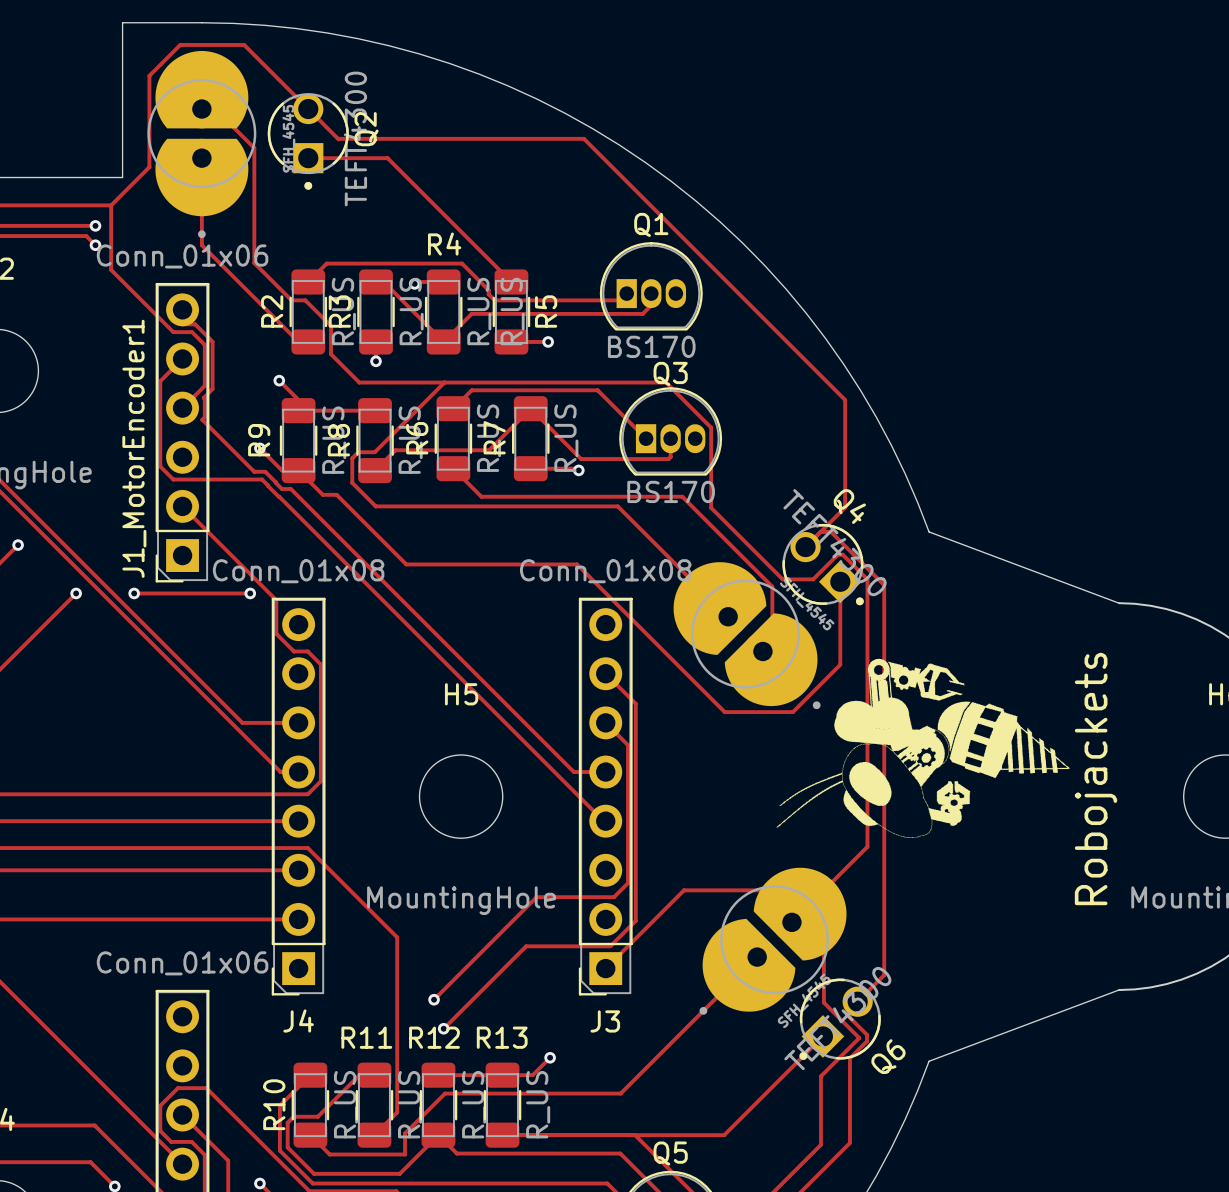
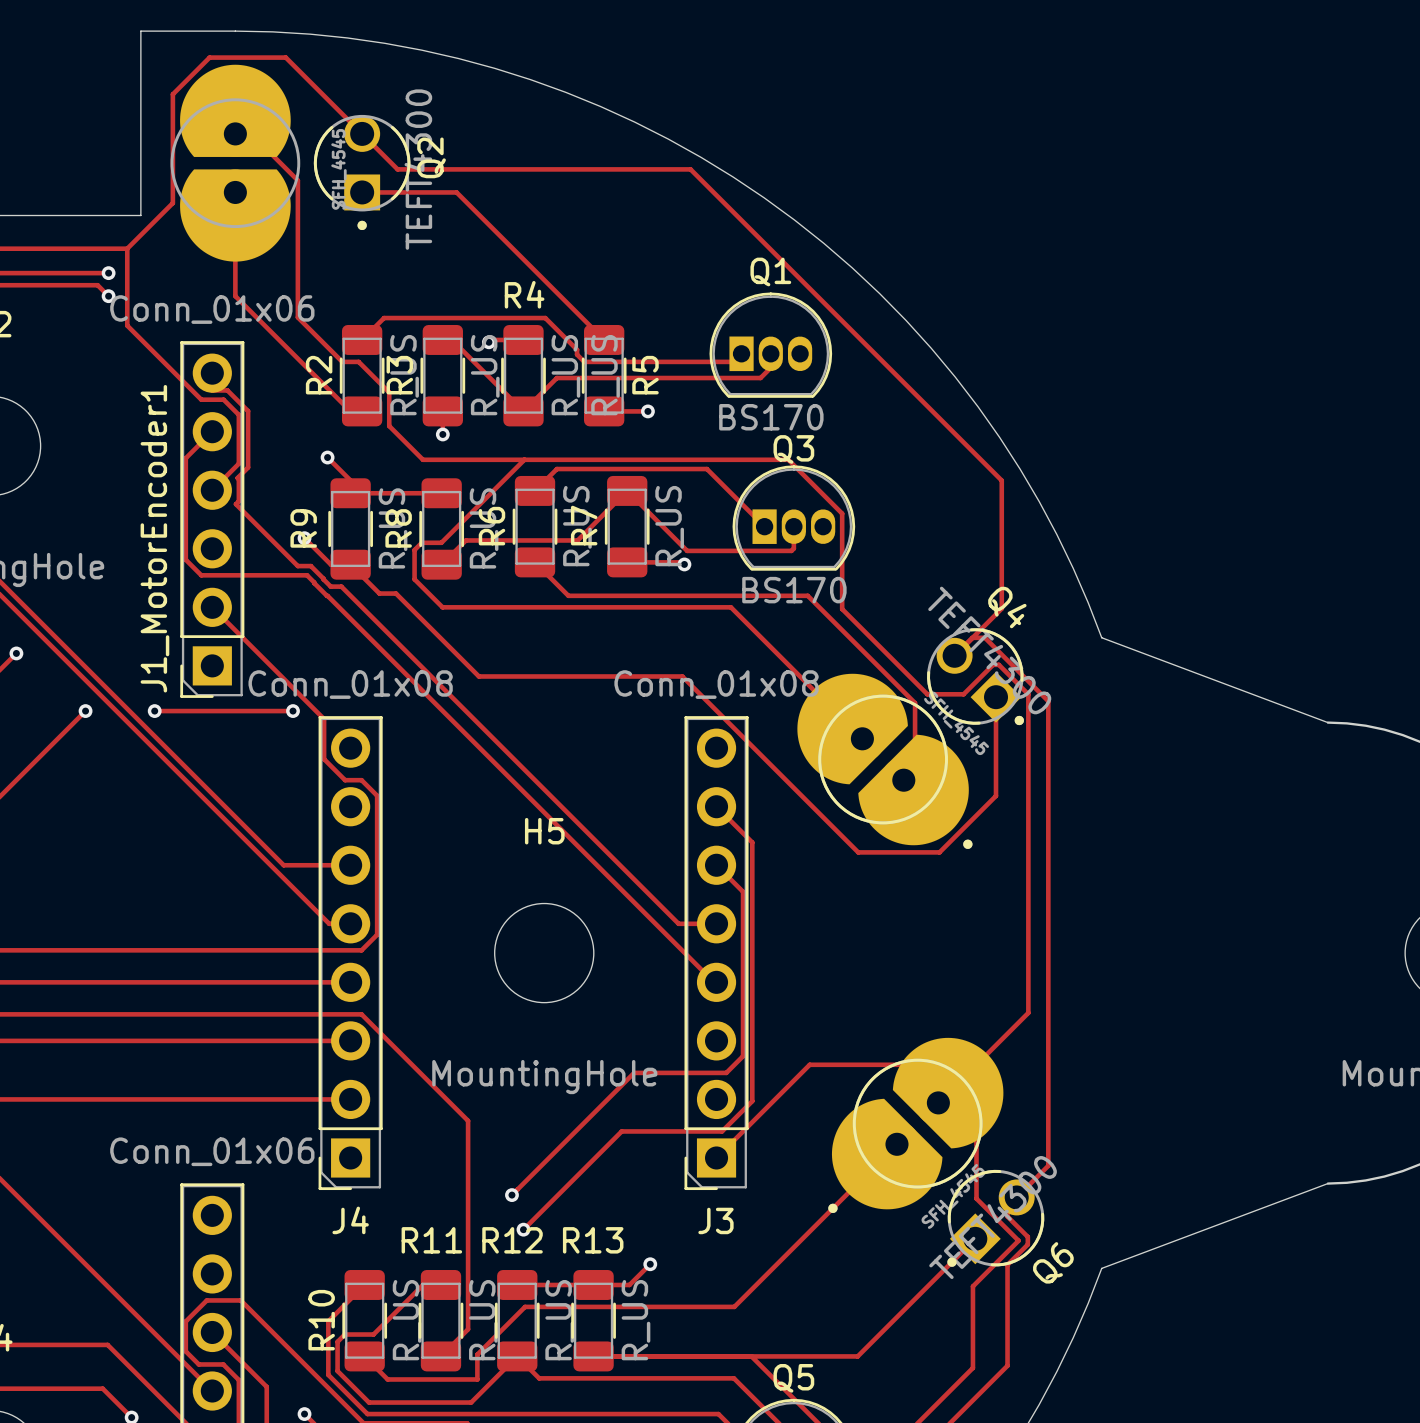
part footprint: [147, 50, 257, 239] -> [170, 64, 301, 262]
part footprint: [673, 562, 821, 710] -> [797, 673, 973, 849]
drawing: [776, 658, 1070, 838] -> none
text: Robojackets (1095, 779) -> none
part footprint: [699, 867, 847, 1015] -> [828, 1037, 1004, 1213]

